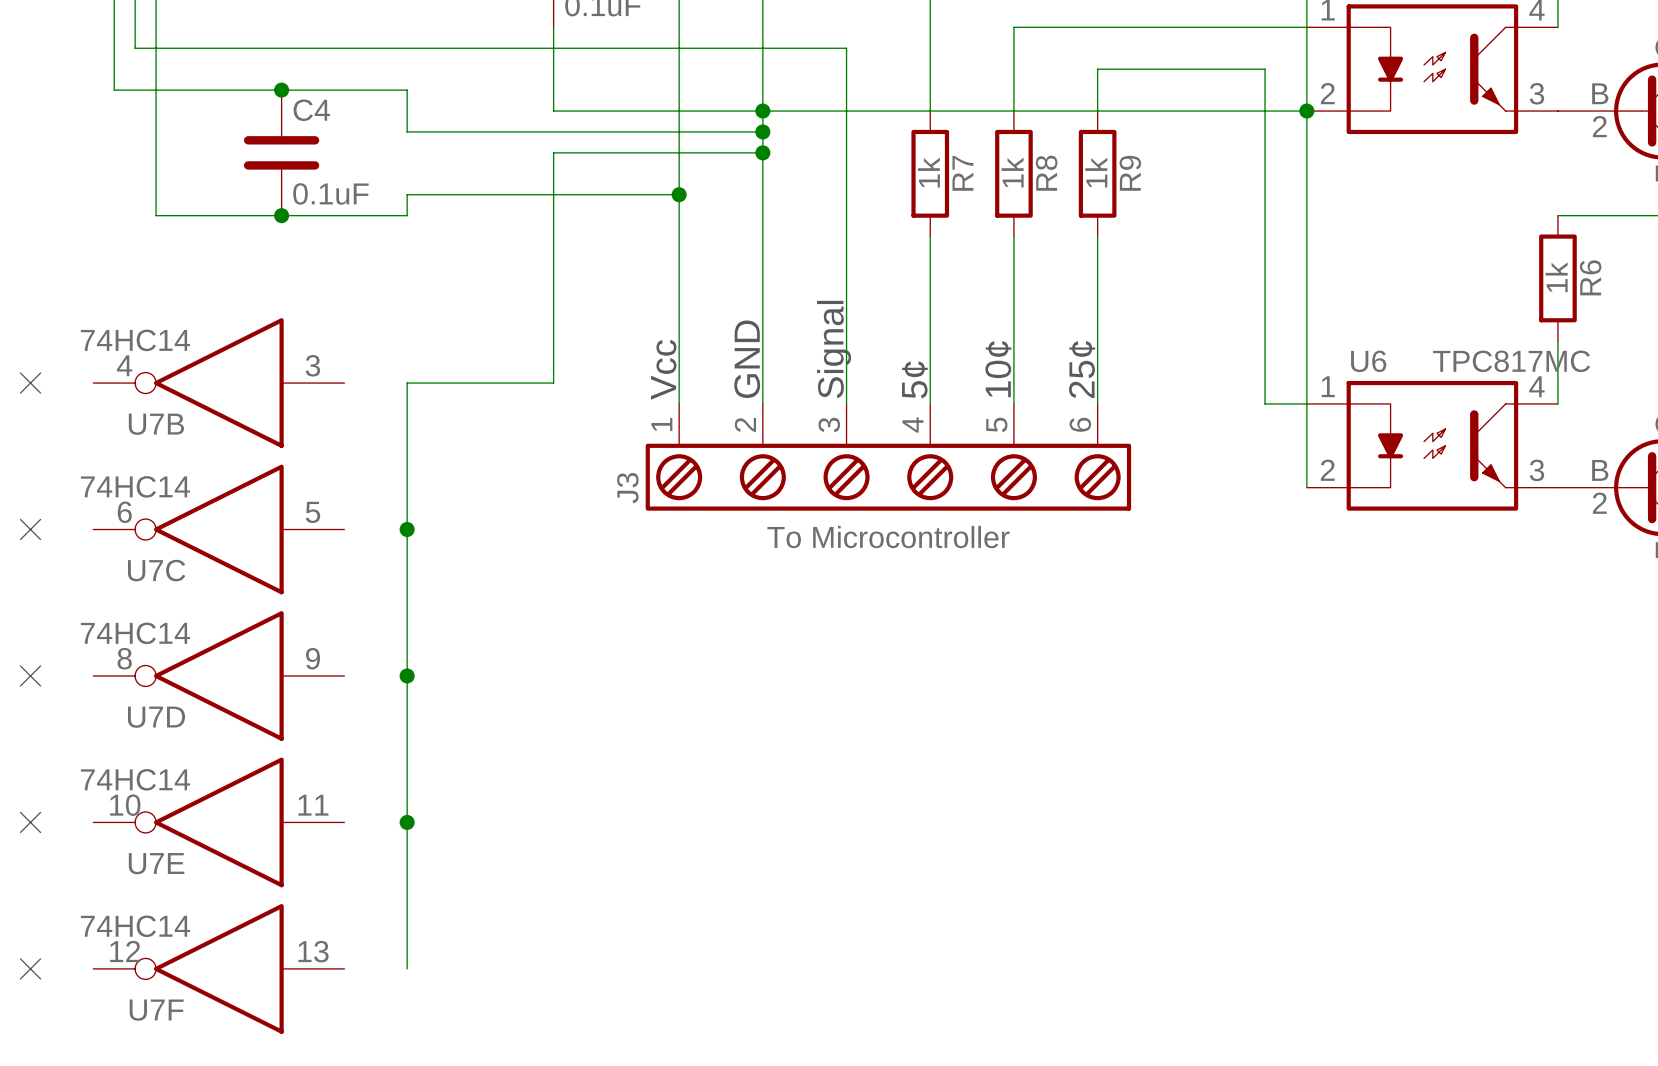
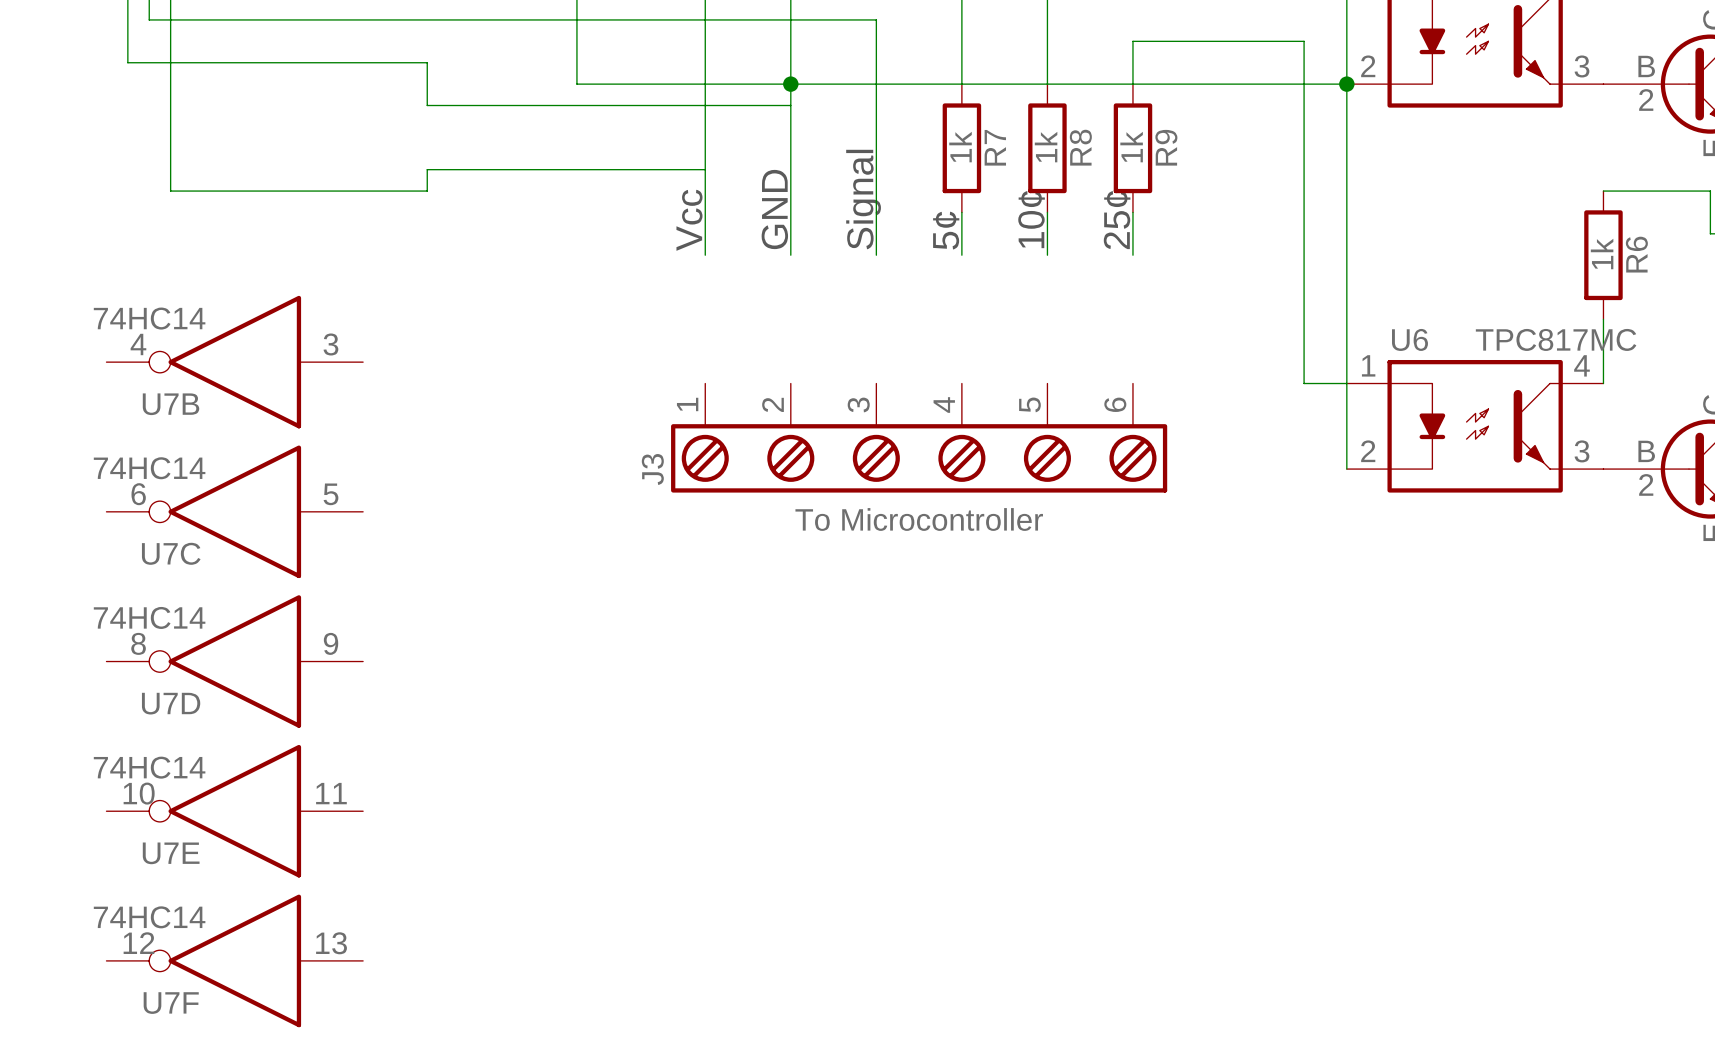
junction: (281, 90) -> none
junction: (762, 131) -> none
C4: 0.1uF (281, 152) -> none
wire: (762, 152) (553, 152) (553, 383) (407, 383) (407, 968) -> none
junction: (762, 152) -> none
junction: (679, 194) -> none
junction: (281, 215) -> none
wire: (679, 278) (679, 403) -> none
wire: (762, 278) (762, 403) -> none
wire: (846, 278) (846, 403) -> none
wire: (930, 278) (930, 403) -> none
wire: (1013, 278) (1013, 403) -> none
wire: (1097, 278) (1097, 403) -> none
text position: Signal (834, 349) -> Signal (863, 199)
text position: GND (747, 359) -> GND (774, 209)
text position: Vcc (663, 369) -> Vcc (689, 220)
text position: 10¢ (998, 369) -> 10¢ (1031, 219)
text position: 25¢ (1082, 369) -> 25¢ (1117, 220)
text position: 5¢ (914, 379) -> 5¢ (946, 230)
no-connect mark: (30, 383) -> none
no-connect mark: (30, 529) -> none
junction: (407, 529) -> none
no-connect mark: (30, 675) -> none
junction: (407, 675) -> none
no-connect mark: (30, 822) -> none
junction: (407, 822) -> none
no-connect mark: (30, 968) -> none

